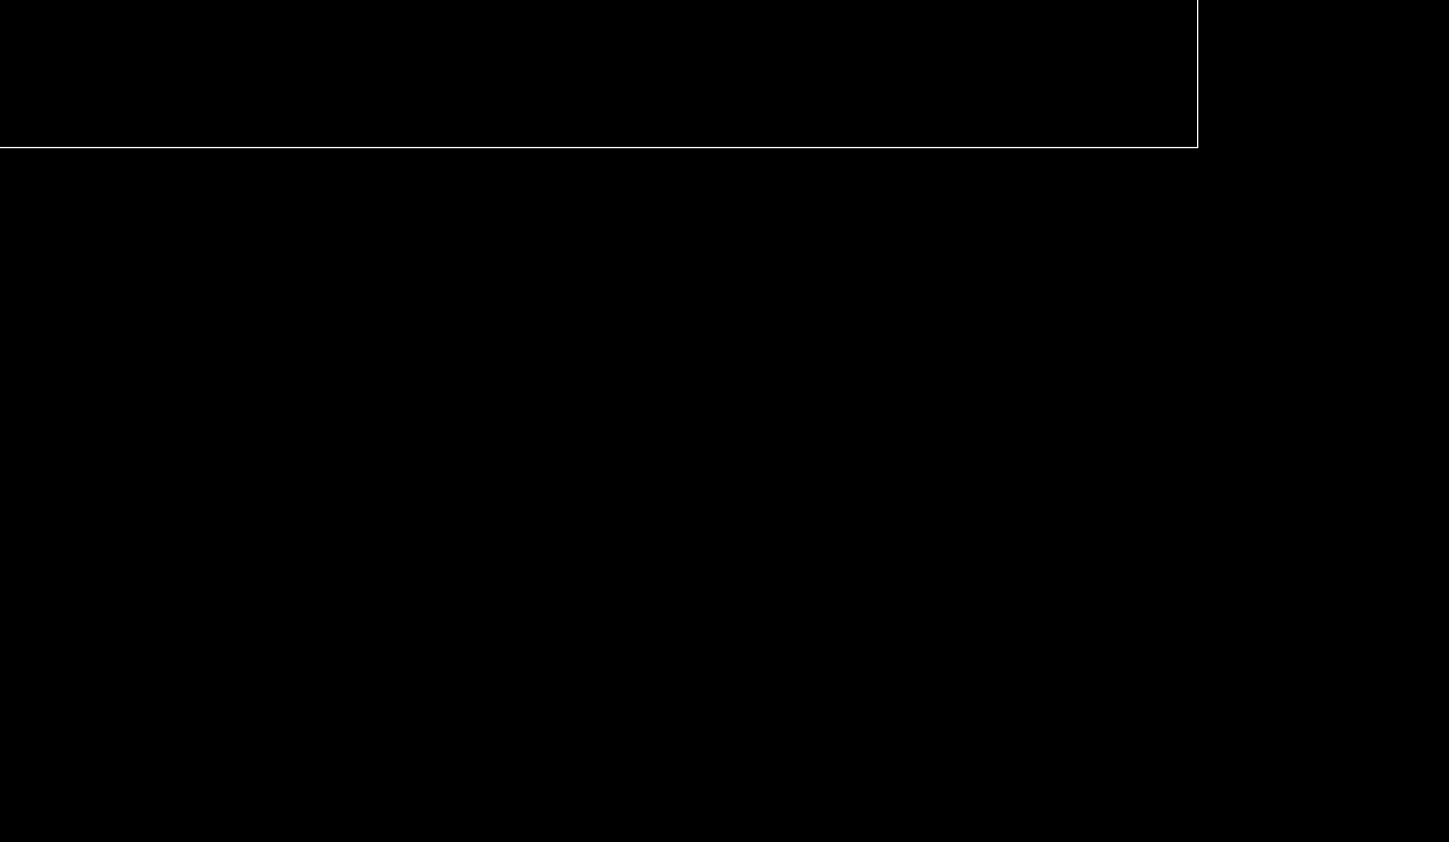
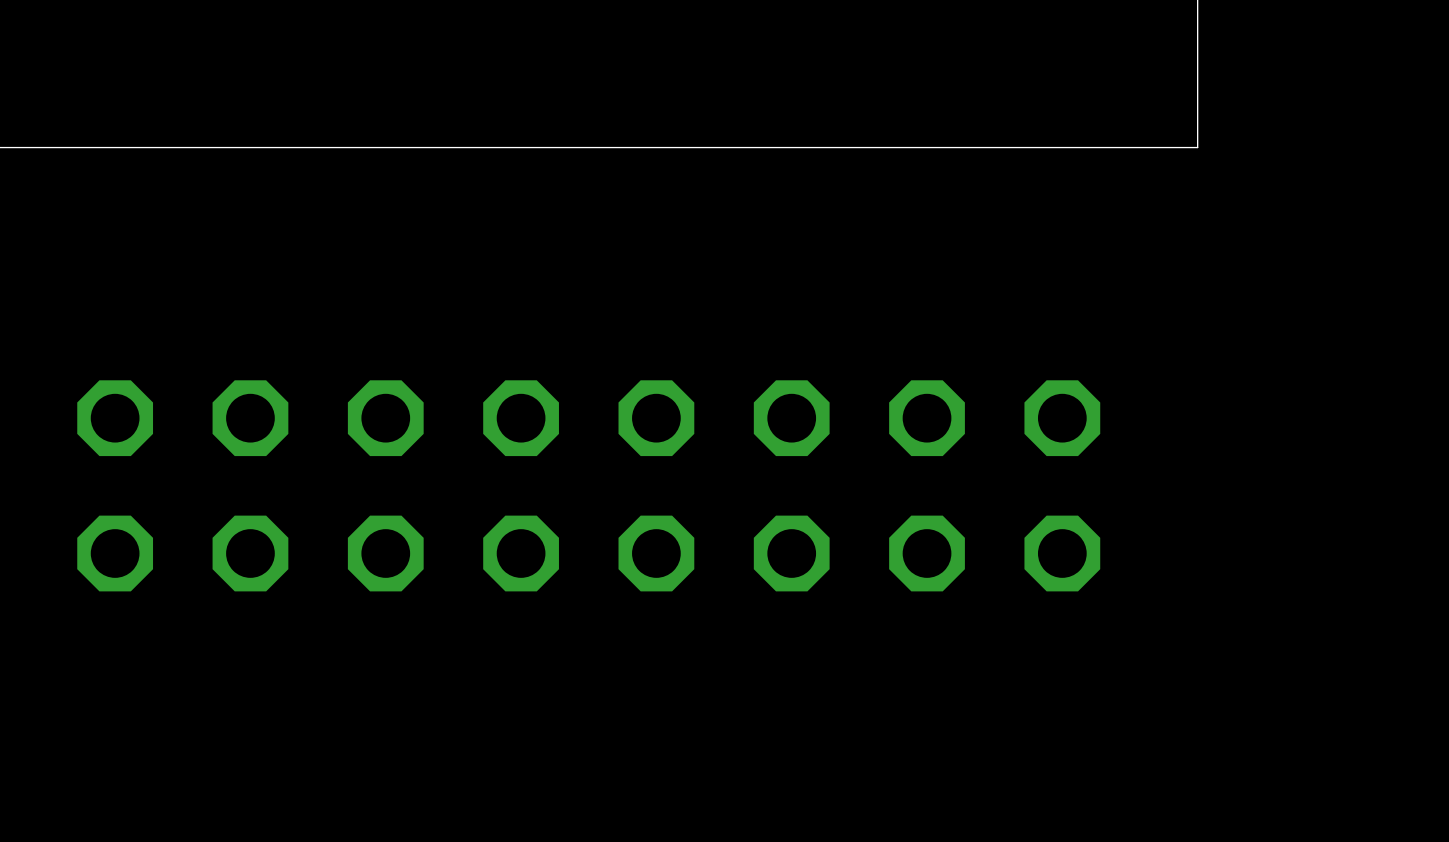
part: none -> (588, 485)

